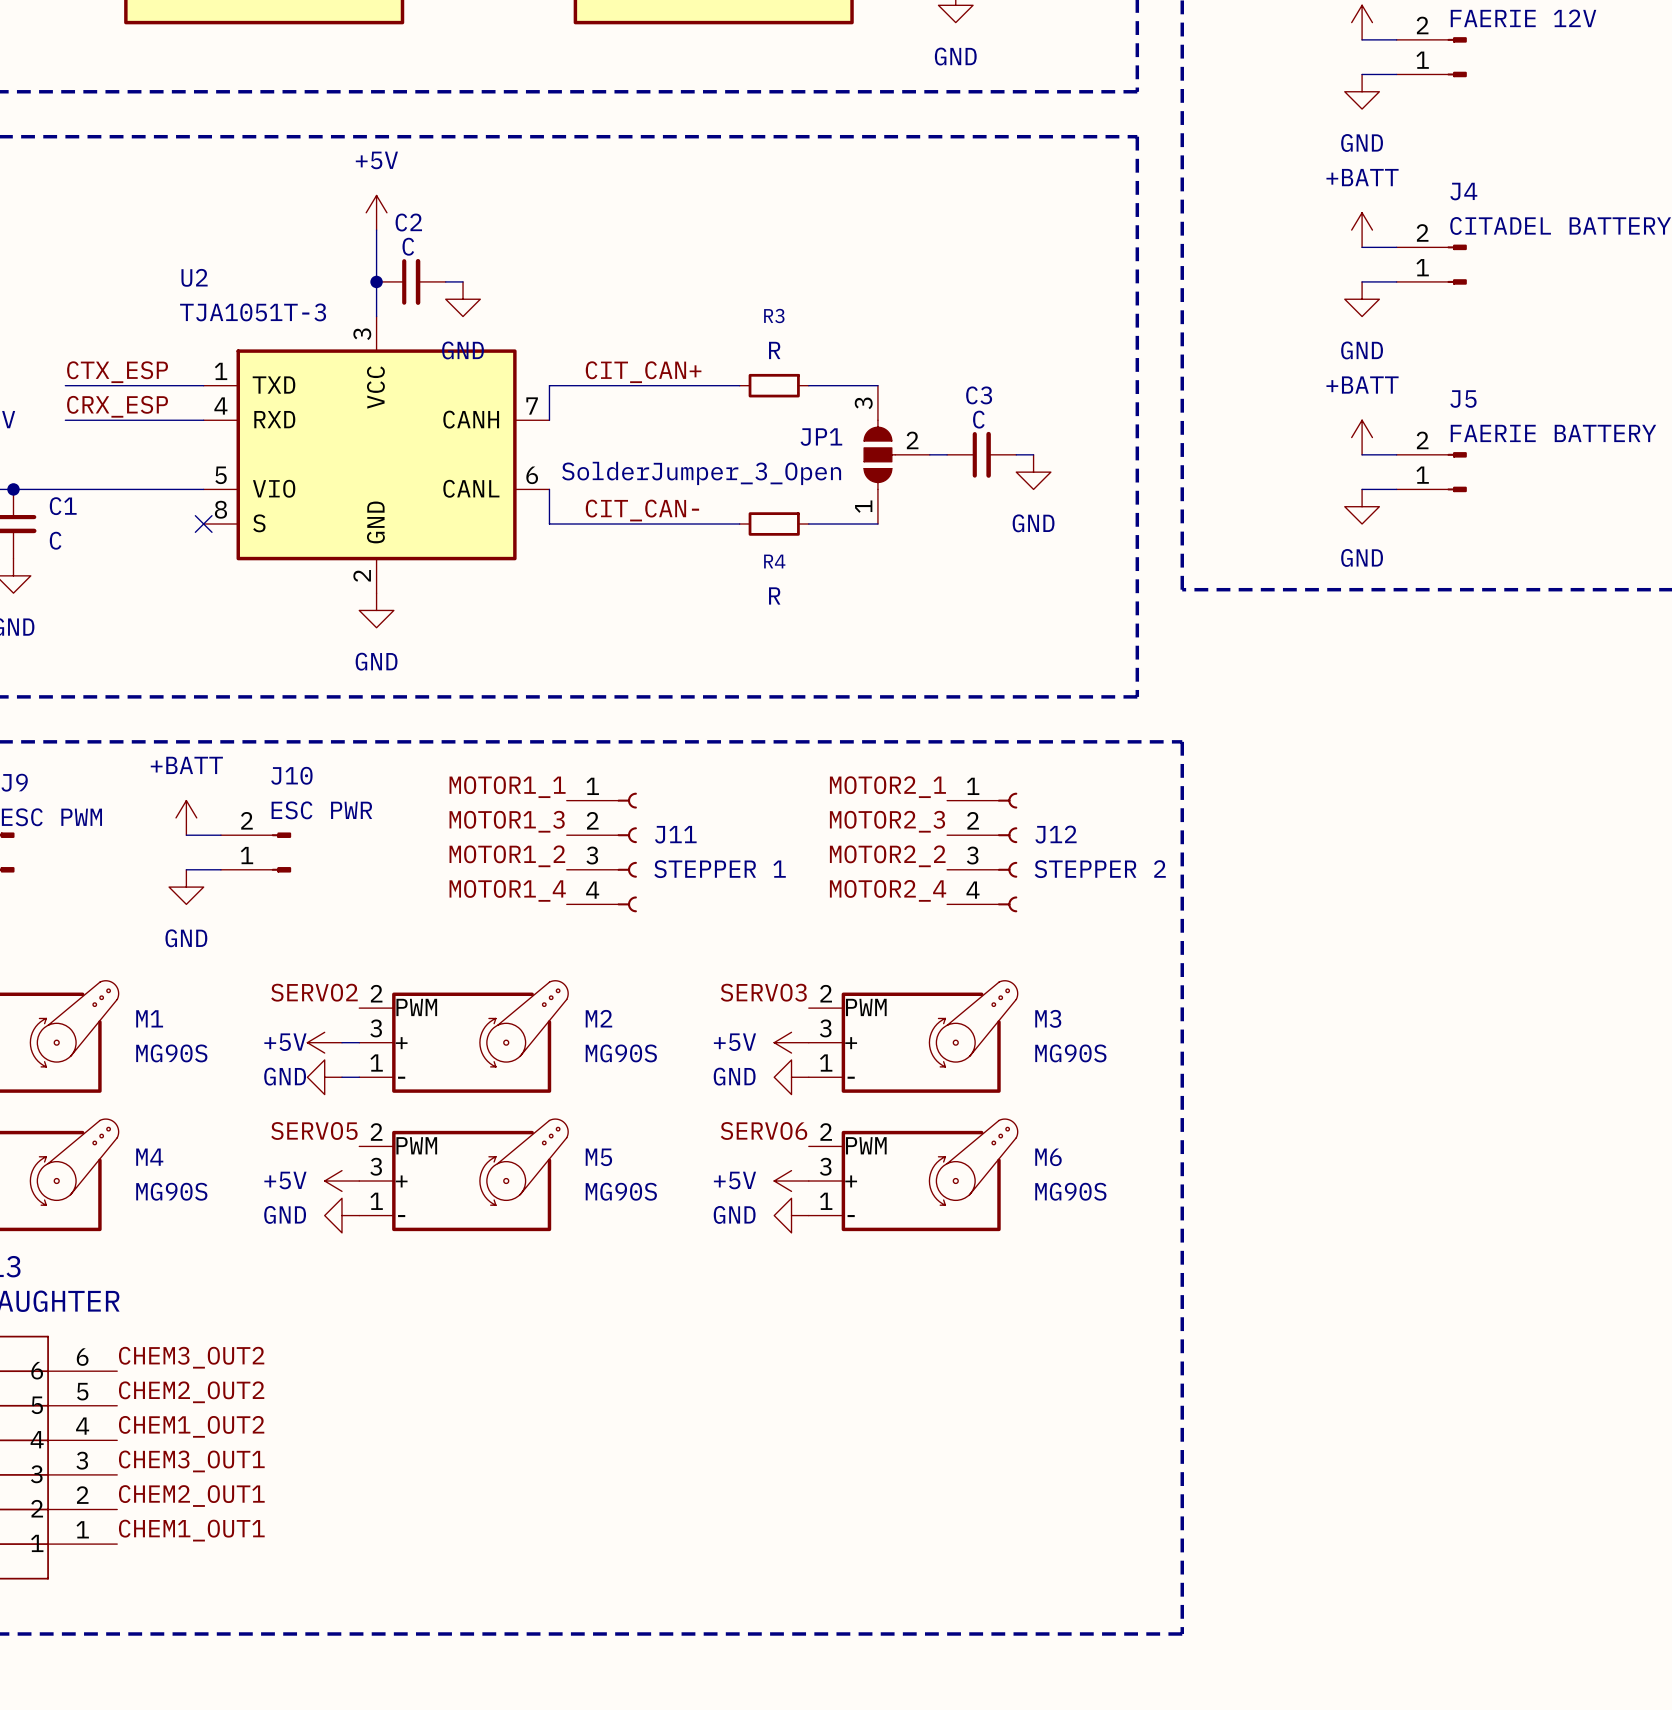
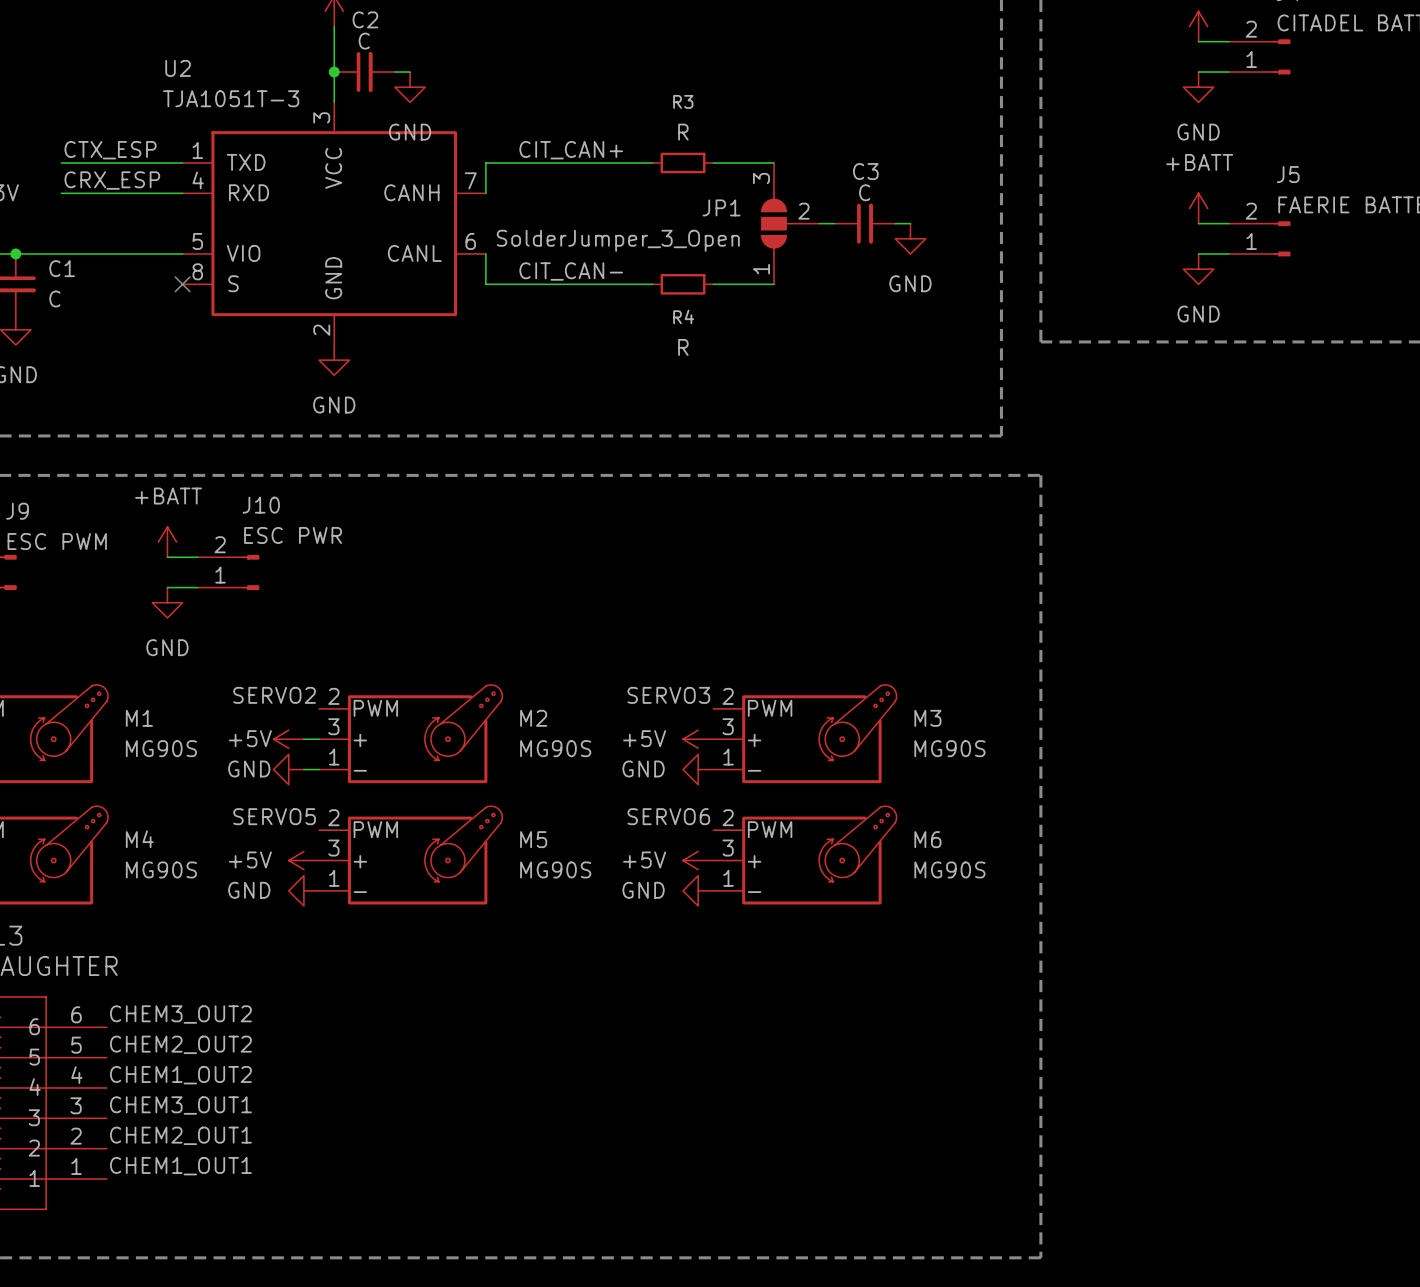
label: MOTOR1_1 (507, 787) -> none
label: MOTOR2_1 (887, 787) -> none
label: MOTOR1_3 (507, 821) -> none
label: MOTOR2_3 (887, 821) -> none
J11: STEPPER 1 (601, 852) -> none
J12: STEPPER 2 (982, 852) -> none
label: MOTOR1_2 (507, 856) -> none
label: MOTOR2_2 (887, 856) -> none
label: MOTOR1_4 (507, 890) -> none
label: MOTOR2_4 (888, 890) -> none

